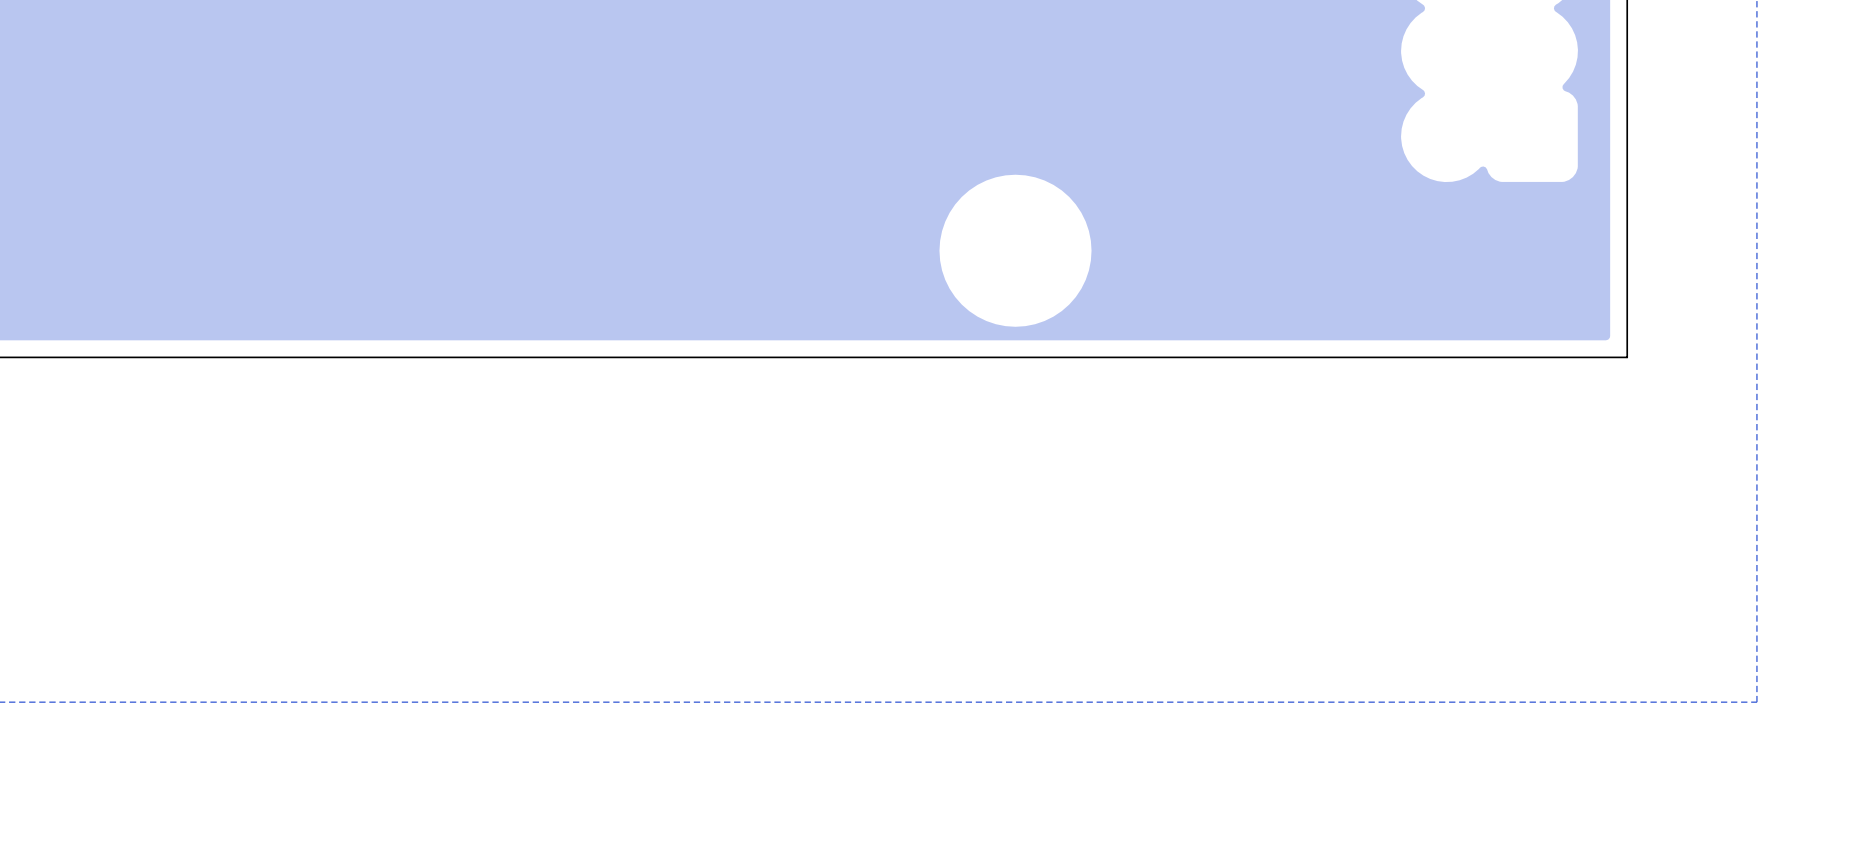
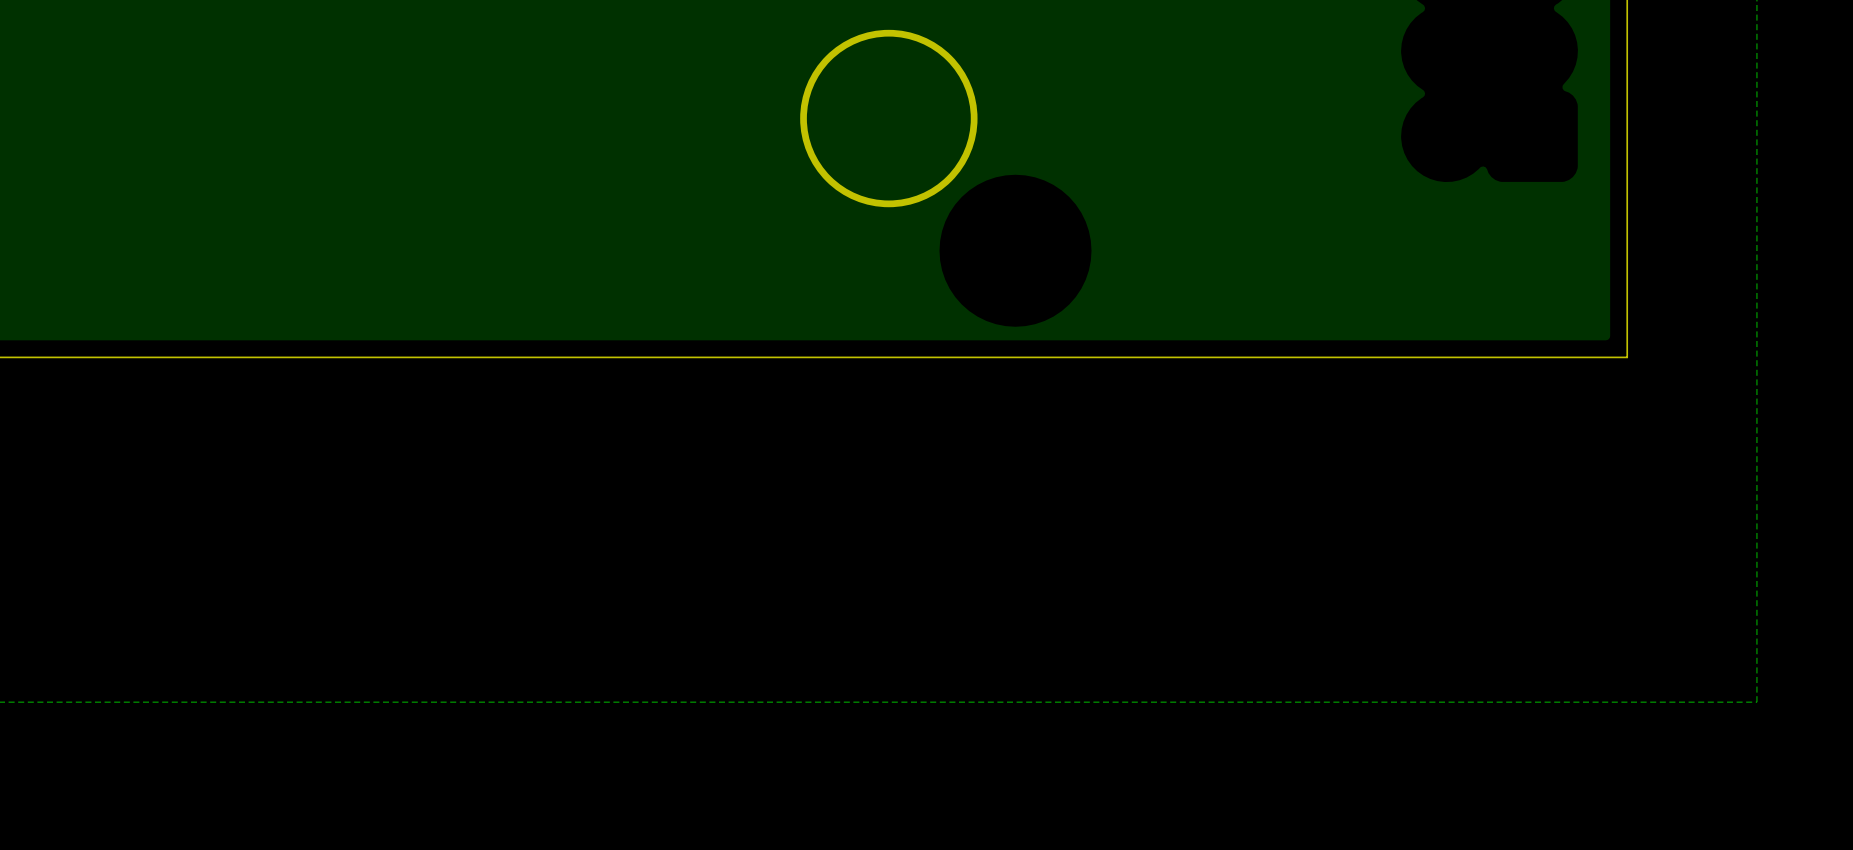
round board edge: none -> [800, 29, 978, 208]

